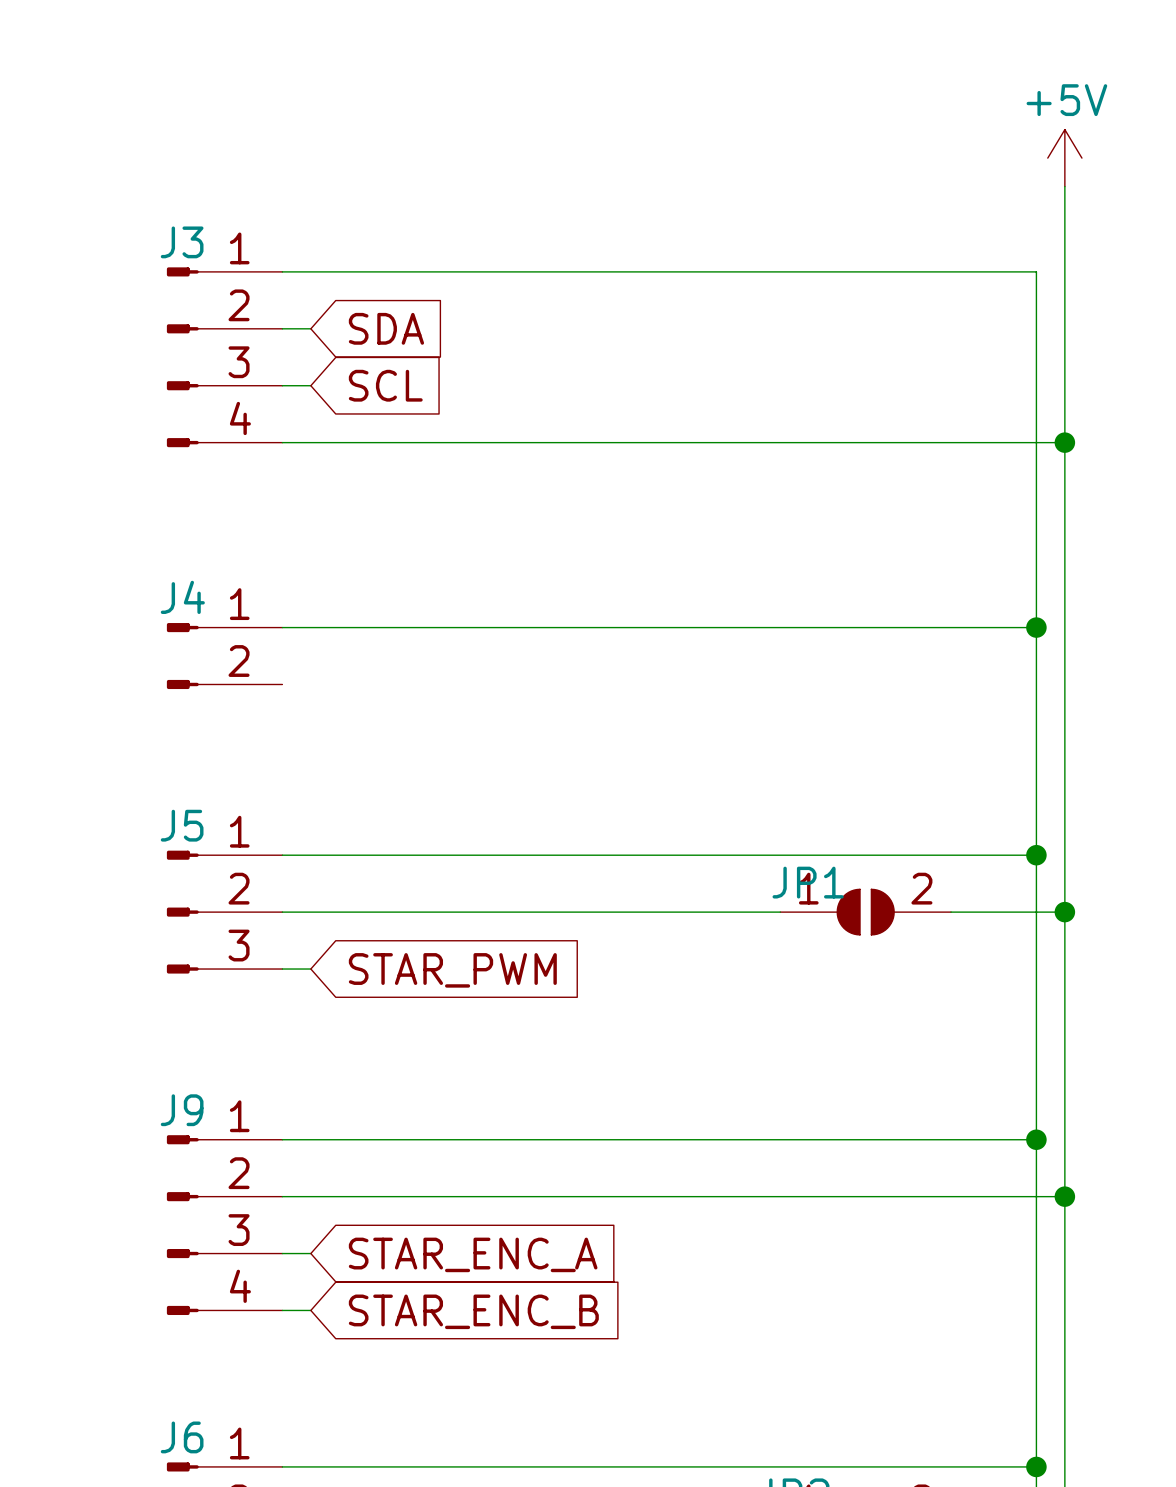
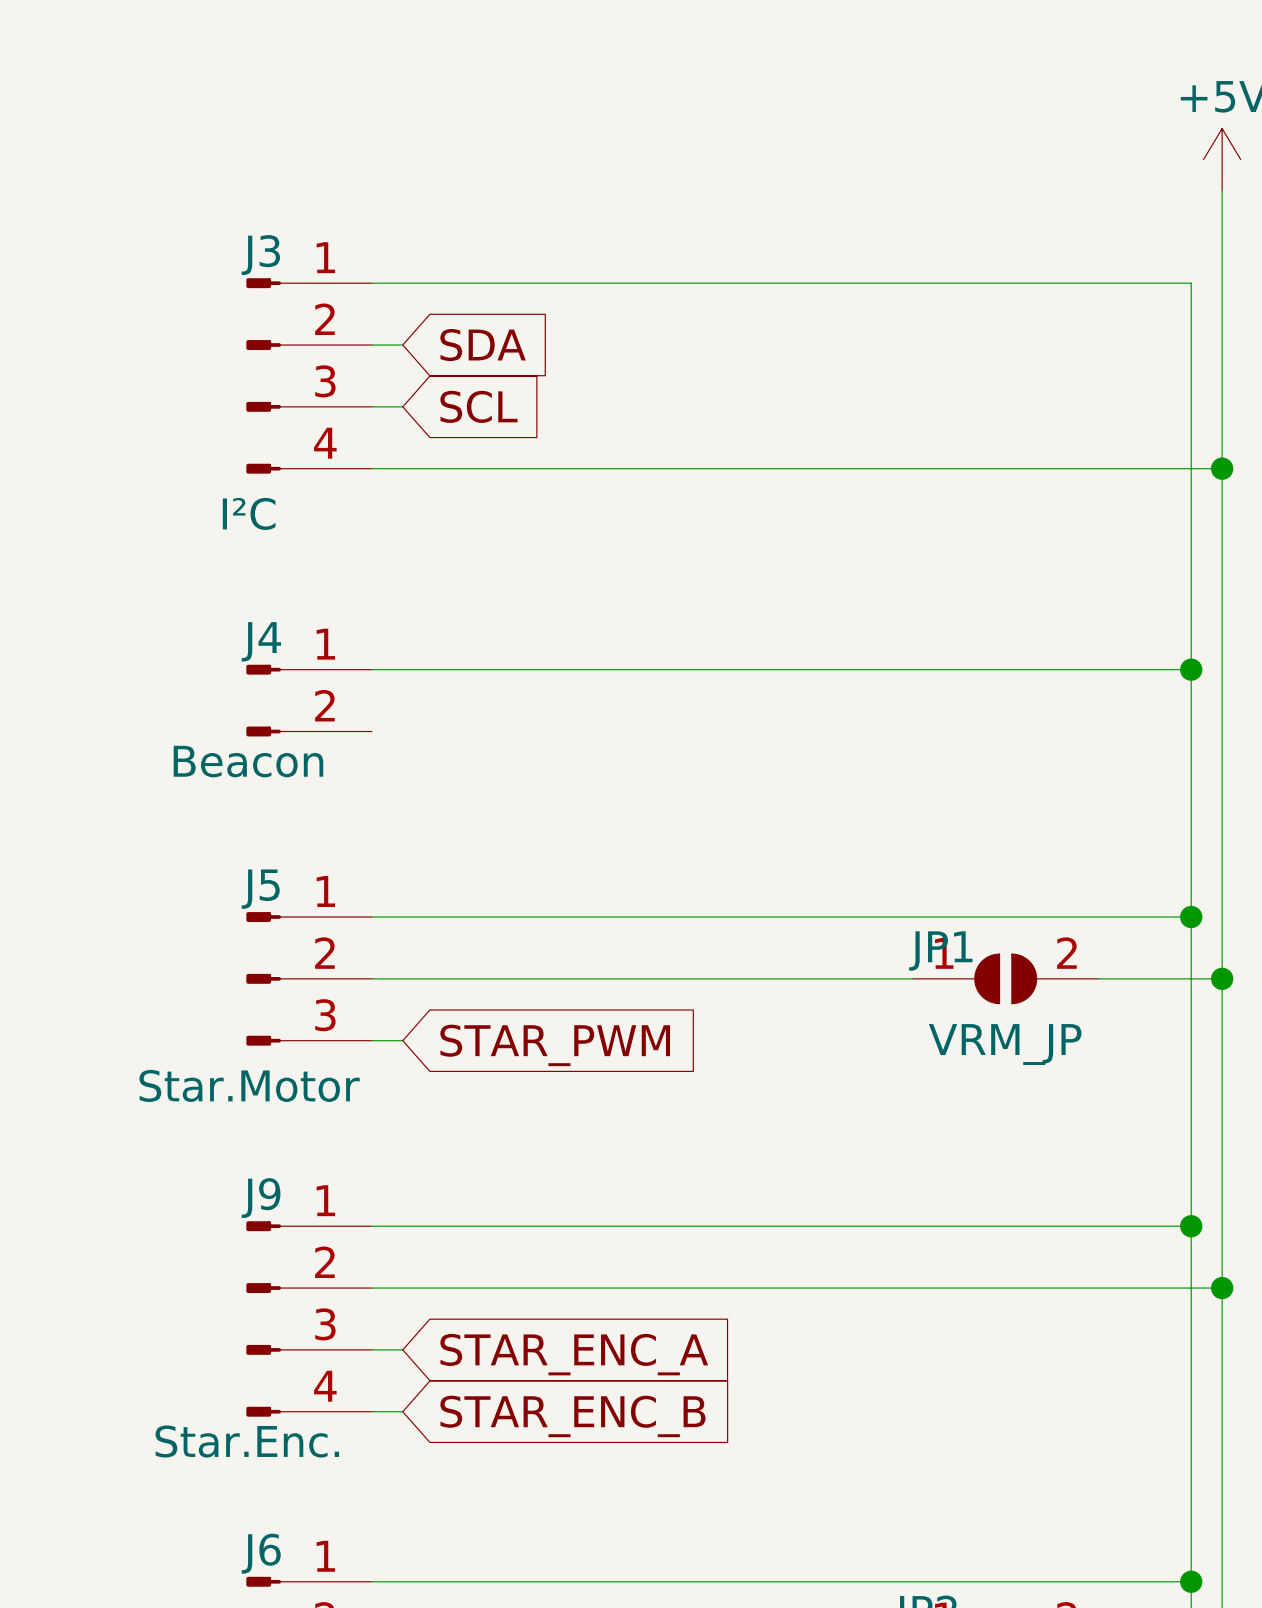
J3 value: none -> I²C (249, 513)
J4 value: none -> Beacon (248, 761)
JP1 value: none -> VRM_JP (1005, 1044)
J5 value: none -> Star.Motor (249, 1085)
J9 value: none -> Star.Enc. (247, 1441)

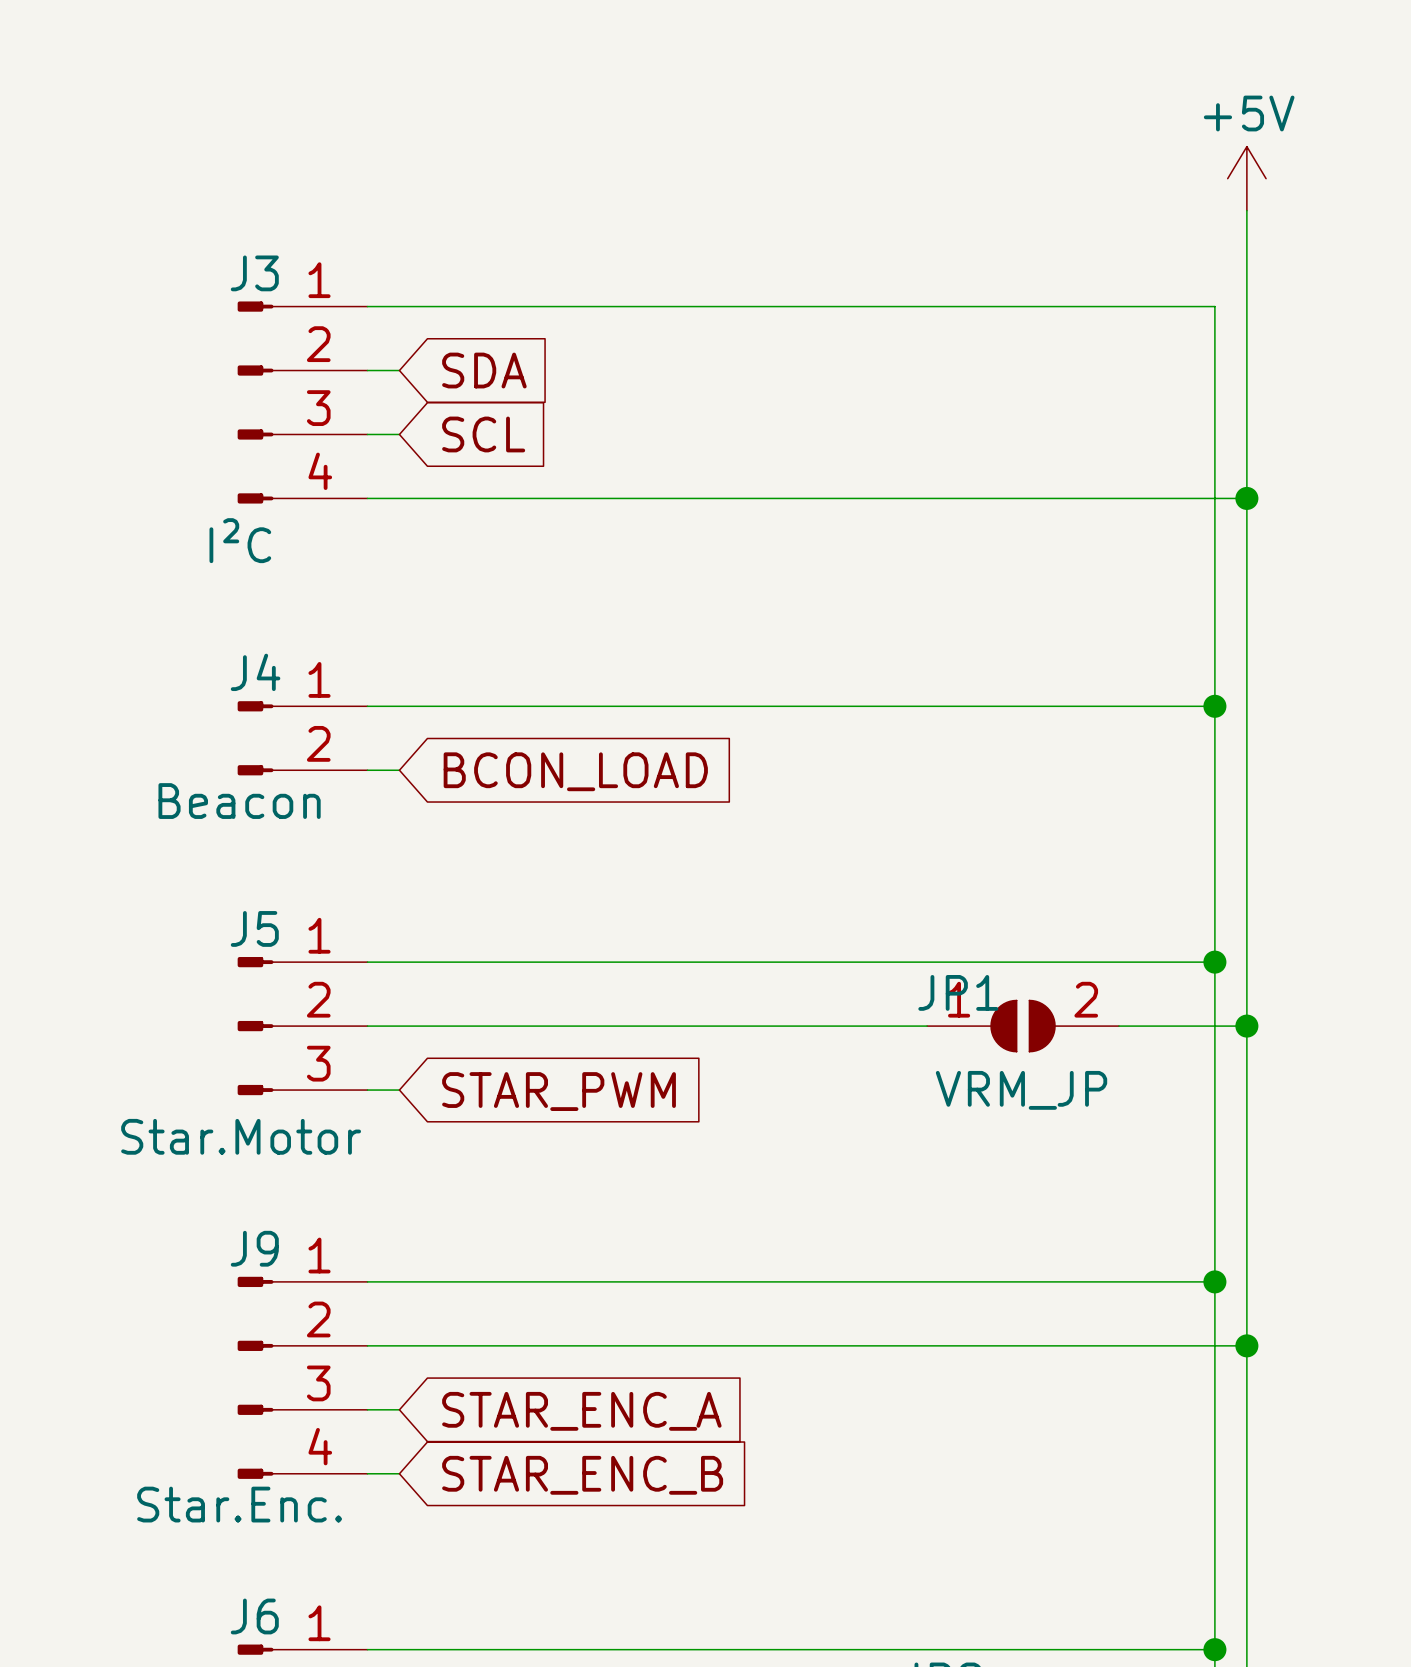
wire: none -> (367, 770) (399, 770)
global label: none -> BCON_LOAD (575, 771)

